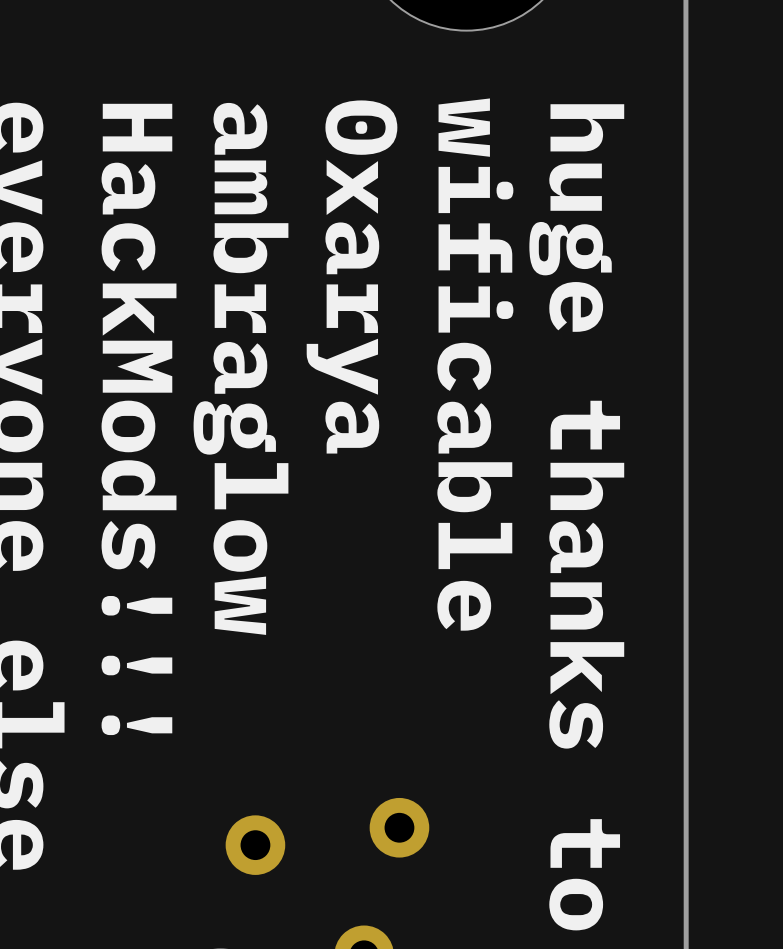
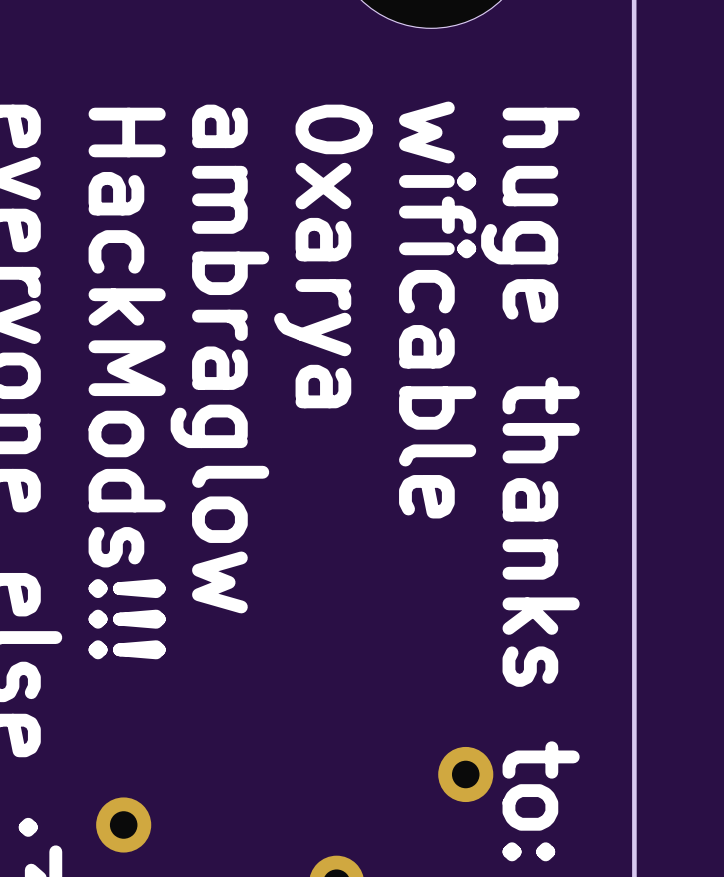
via position: (399, 827) -> (465, 774)
via: (255, 845) -> none
via: none -> (123, 824)

